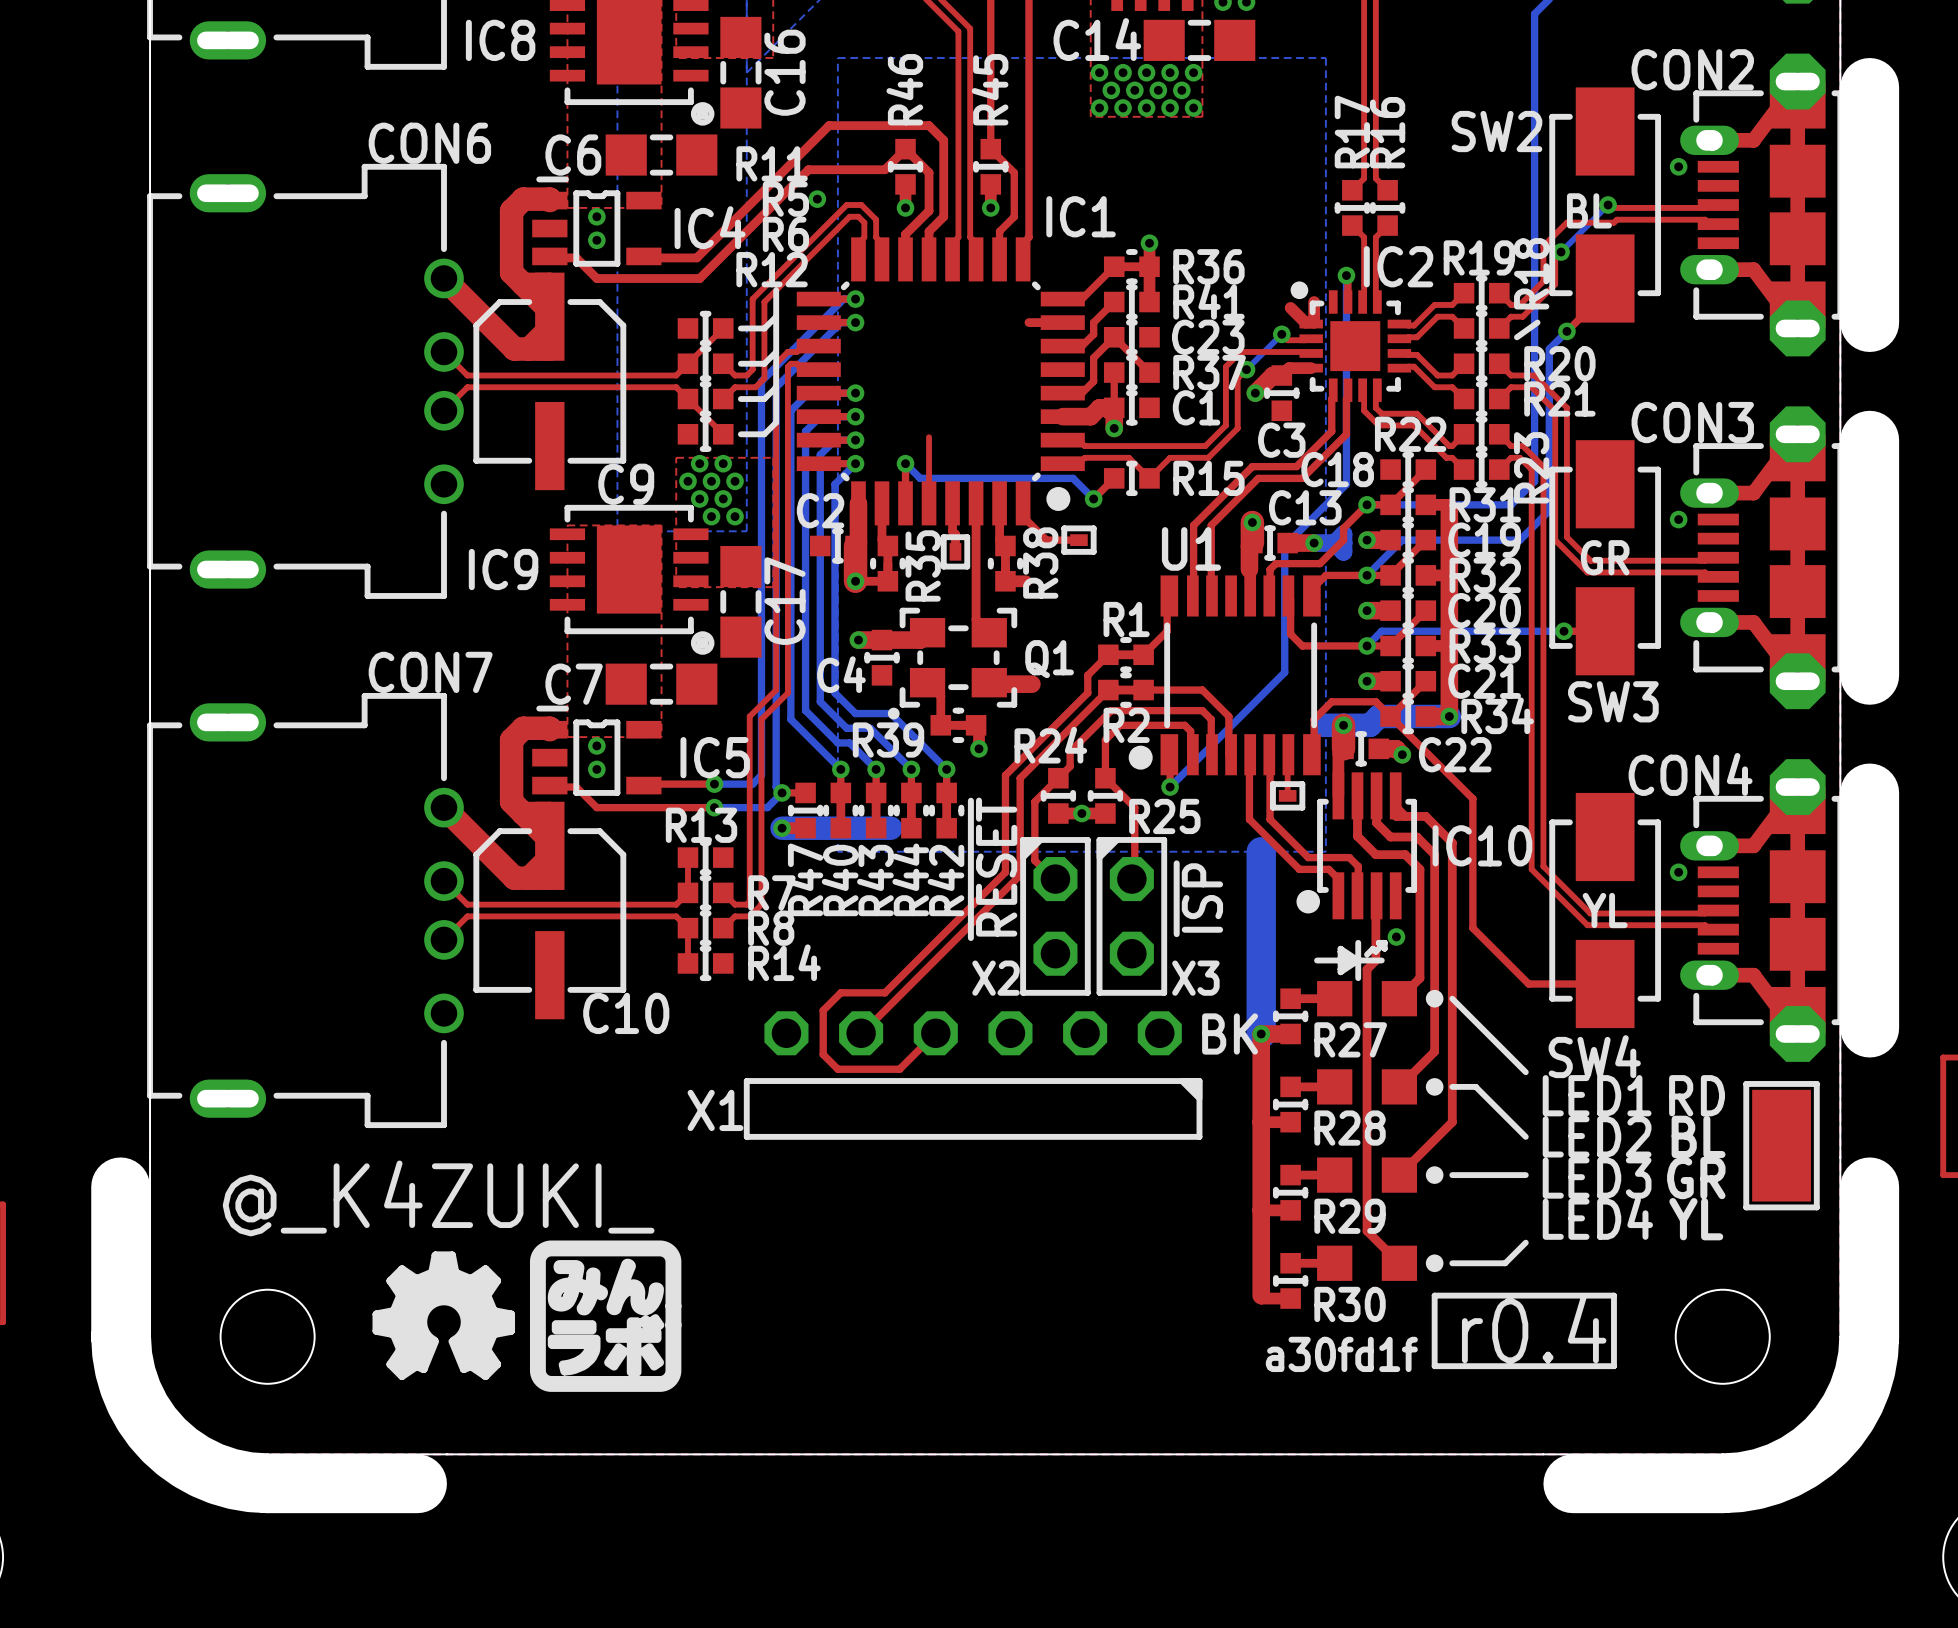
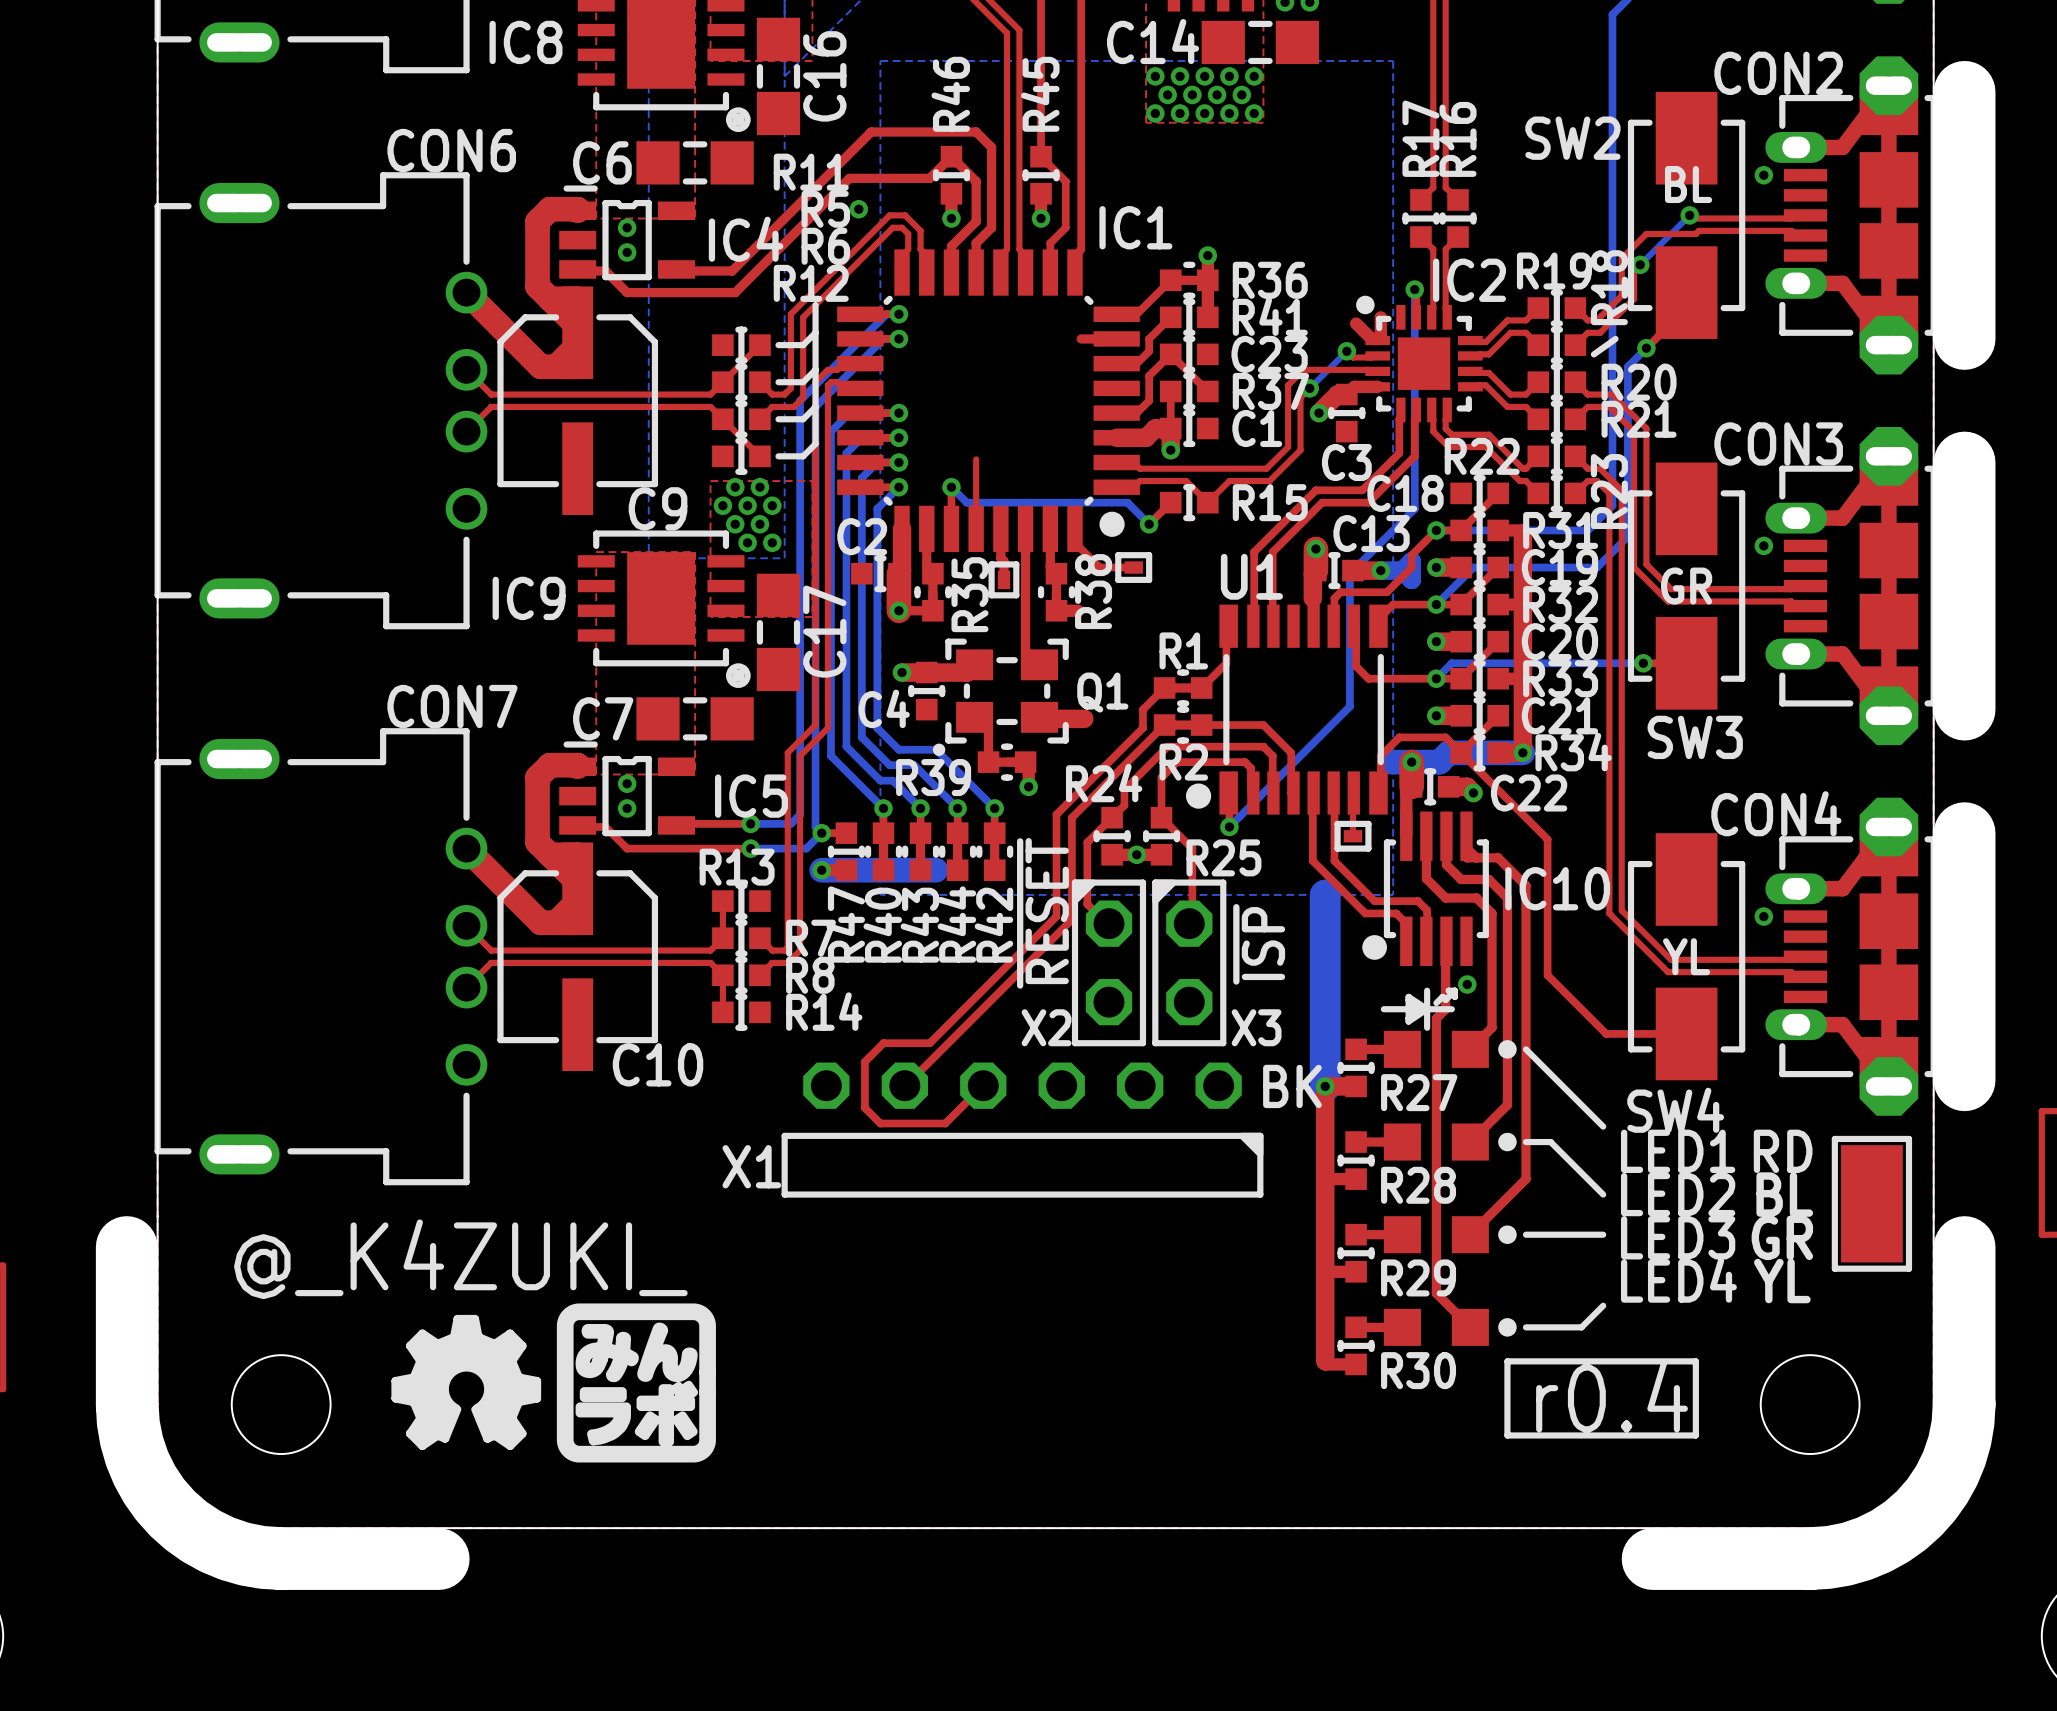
text position: BL (1589, 210) -> BL (1688, 184)
drawing: [1265, 1336, 1418, 1373] -> none

